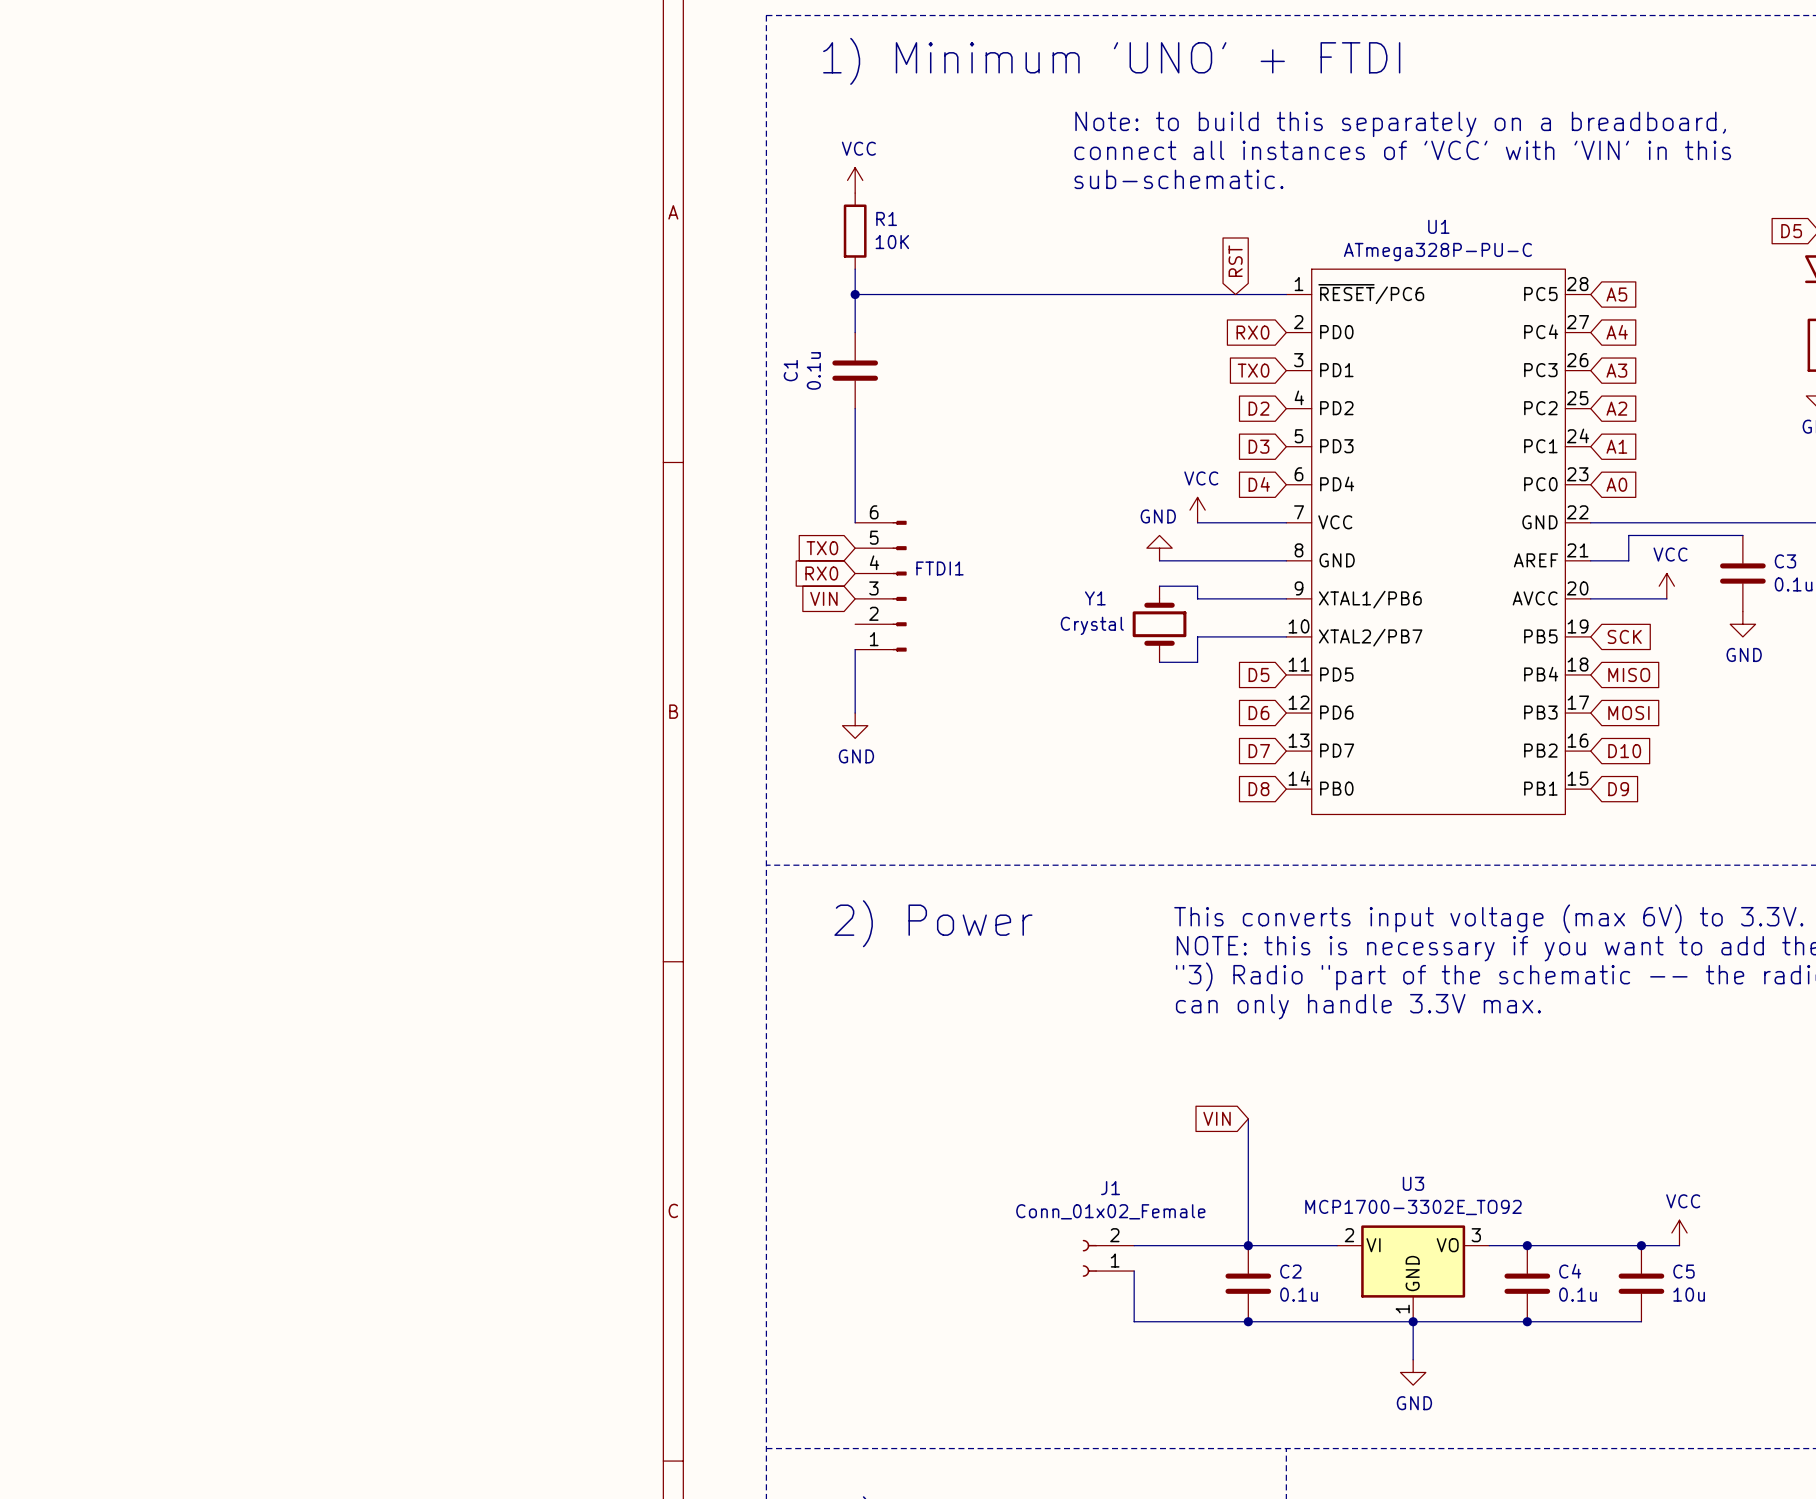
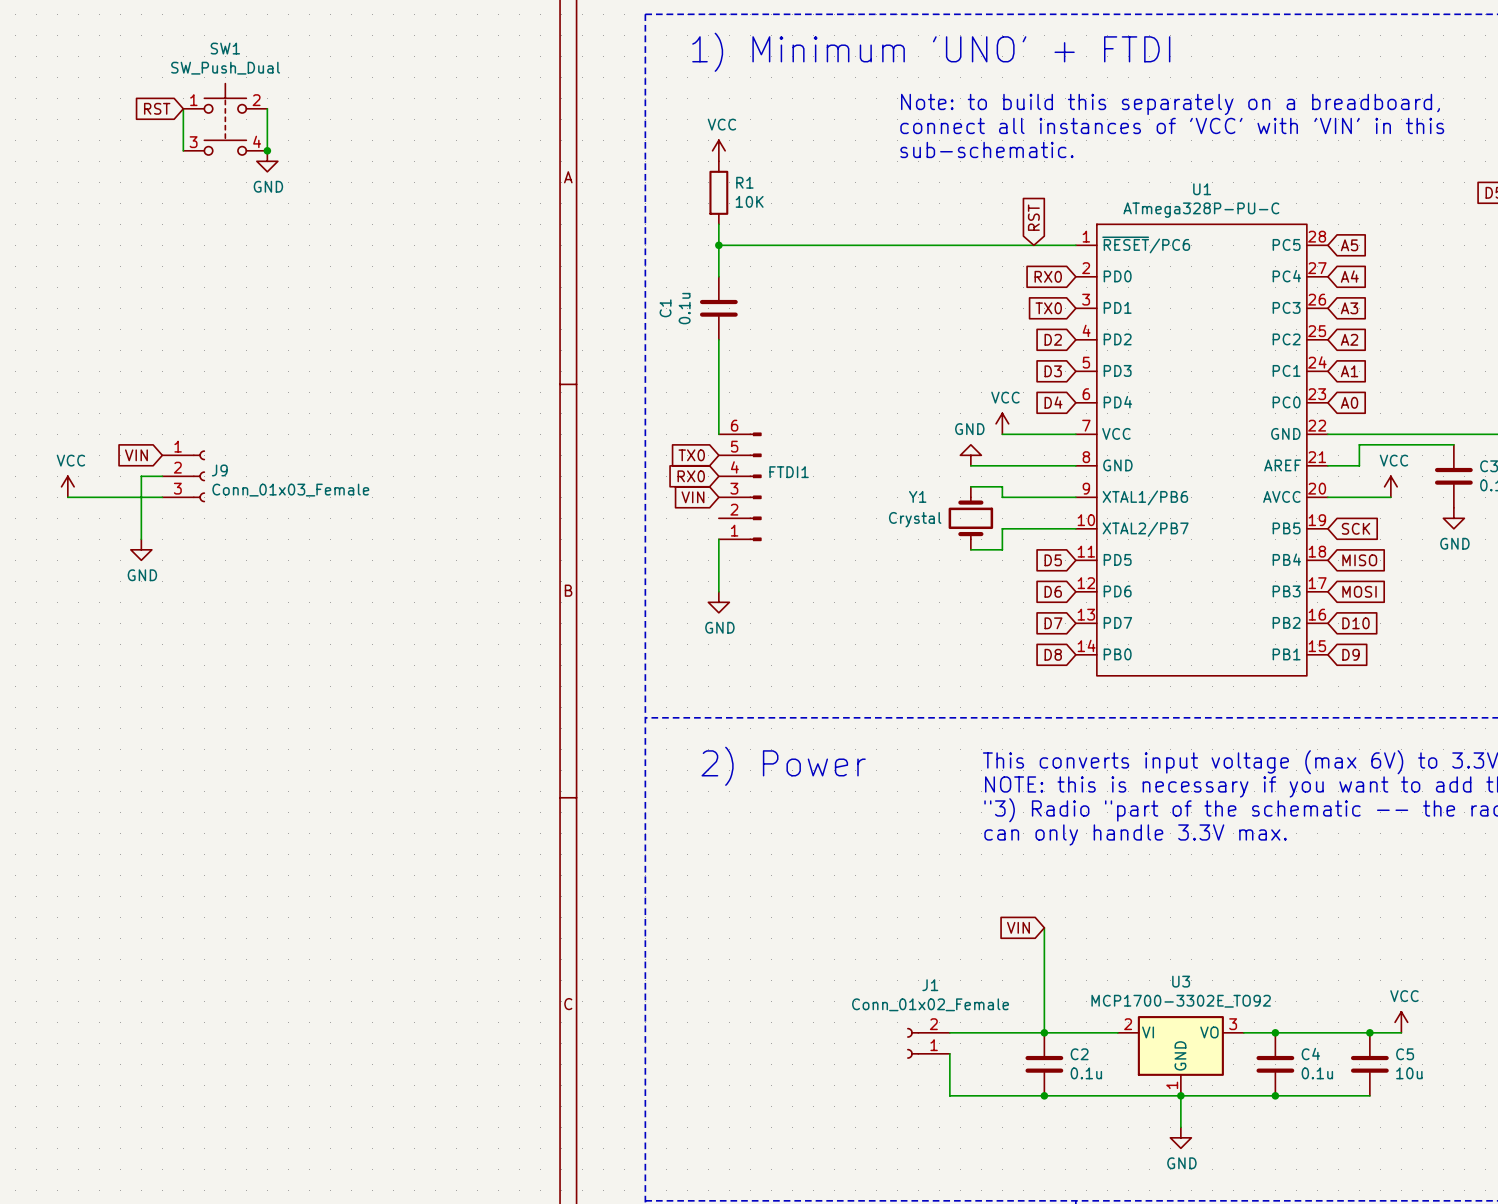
global label: none -> RST (157, 108)
wire: none -> (183, 108) (183, 150)
wire: none -> (267, 108) (267, 150)
SW1: none -> SW_Push_Dual (225, 119)
junction: none -> (267, 150)
power symbol: none -> GND (267, 161)
global label: none -> VIN (136, 455)
wire: none -> (162, 476) (141, 476) (141, 539)
J9: none -> Conn_01x03_Female (183, 476)
power symbol: none -> VCC (67, 486)
wire: none -> (67, 497) (162, 497)
power symbol: none -> GND (141, 549)

